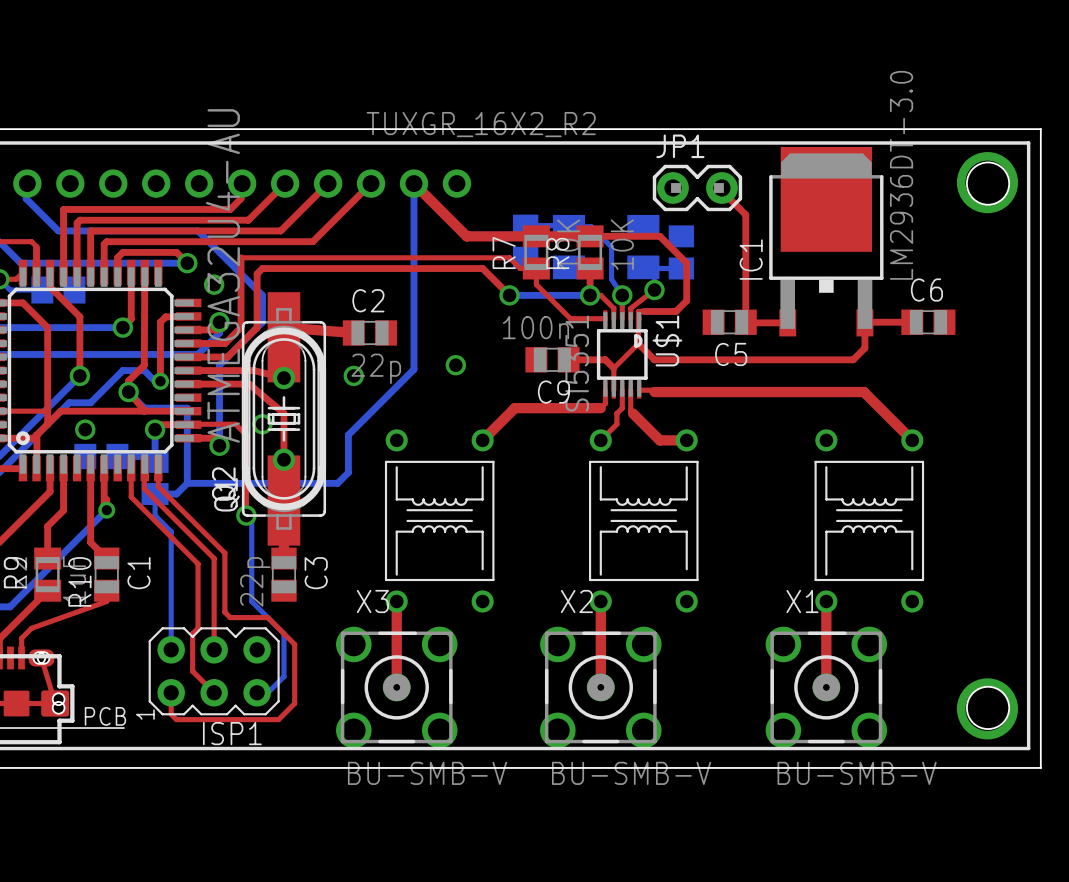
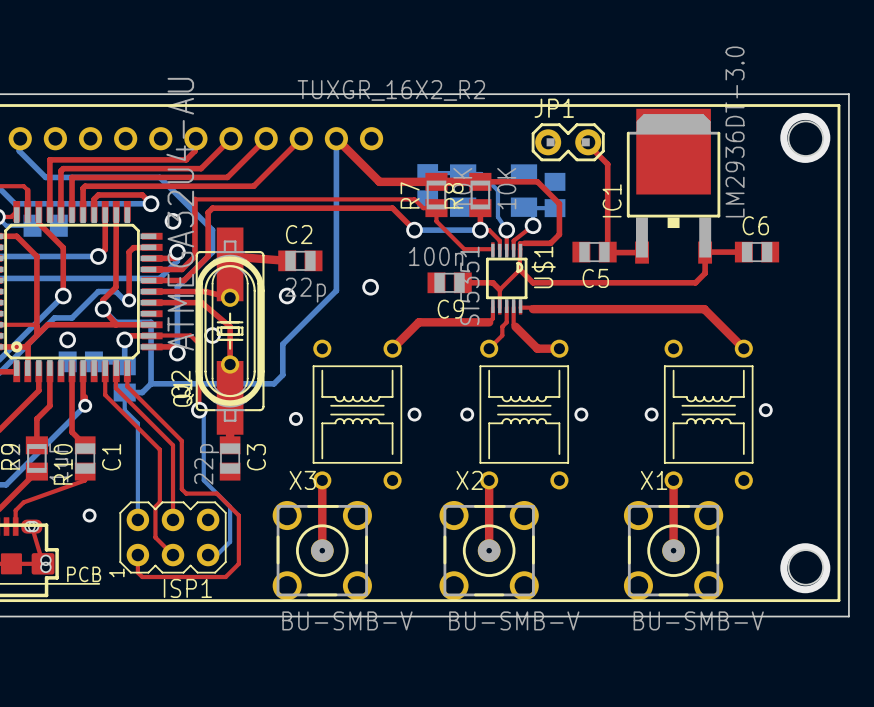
via: none -> (765, 410)
via: none -> (414, 414)
via: none -> (467, 414)
via: none -> (581, 414)
via: none -> (651, 414)
via: none -> (295, 418)
via: none -> (89, 515)

